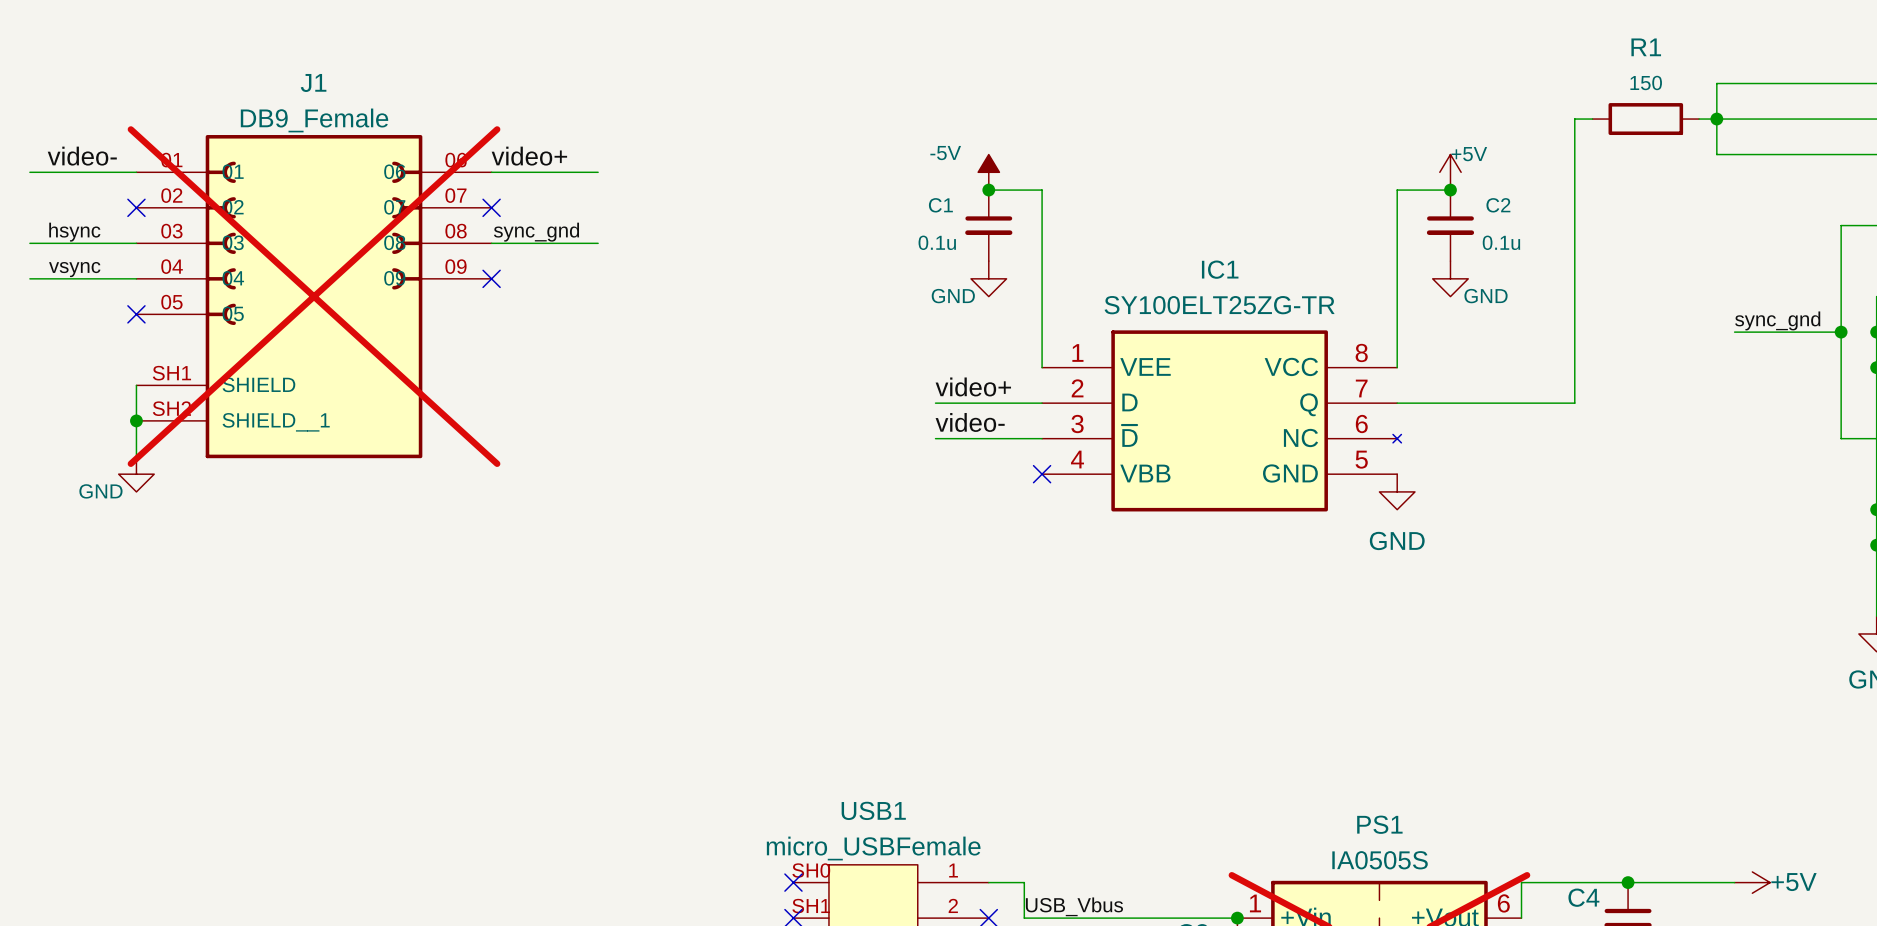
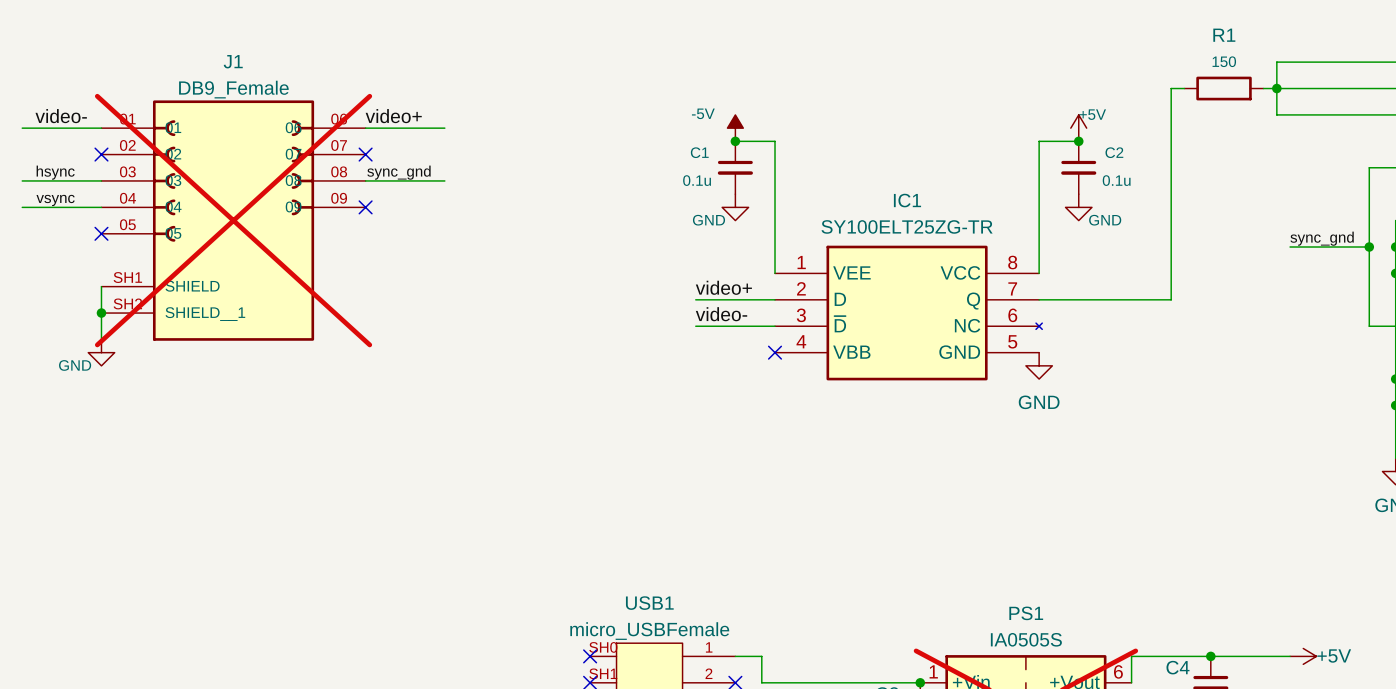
label: USB_Vbus (1074, 906) -> none

